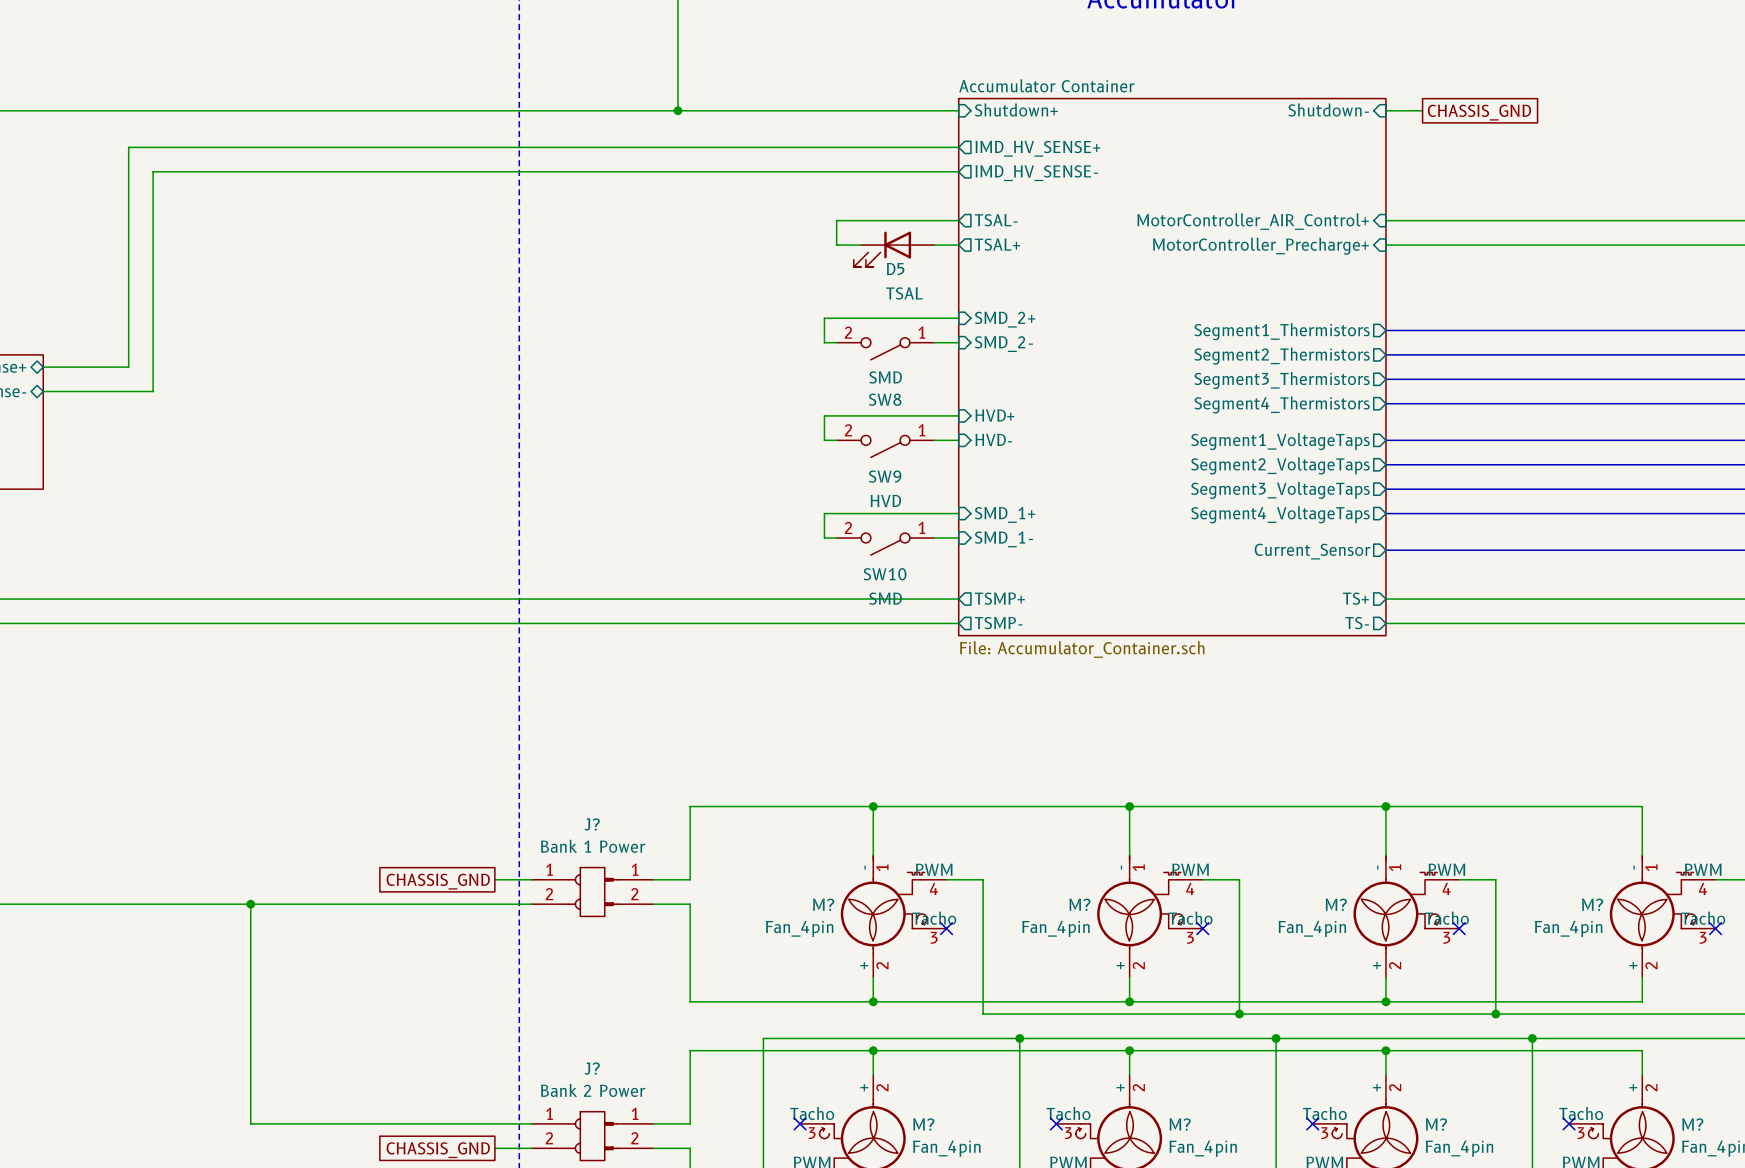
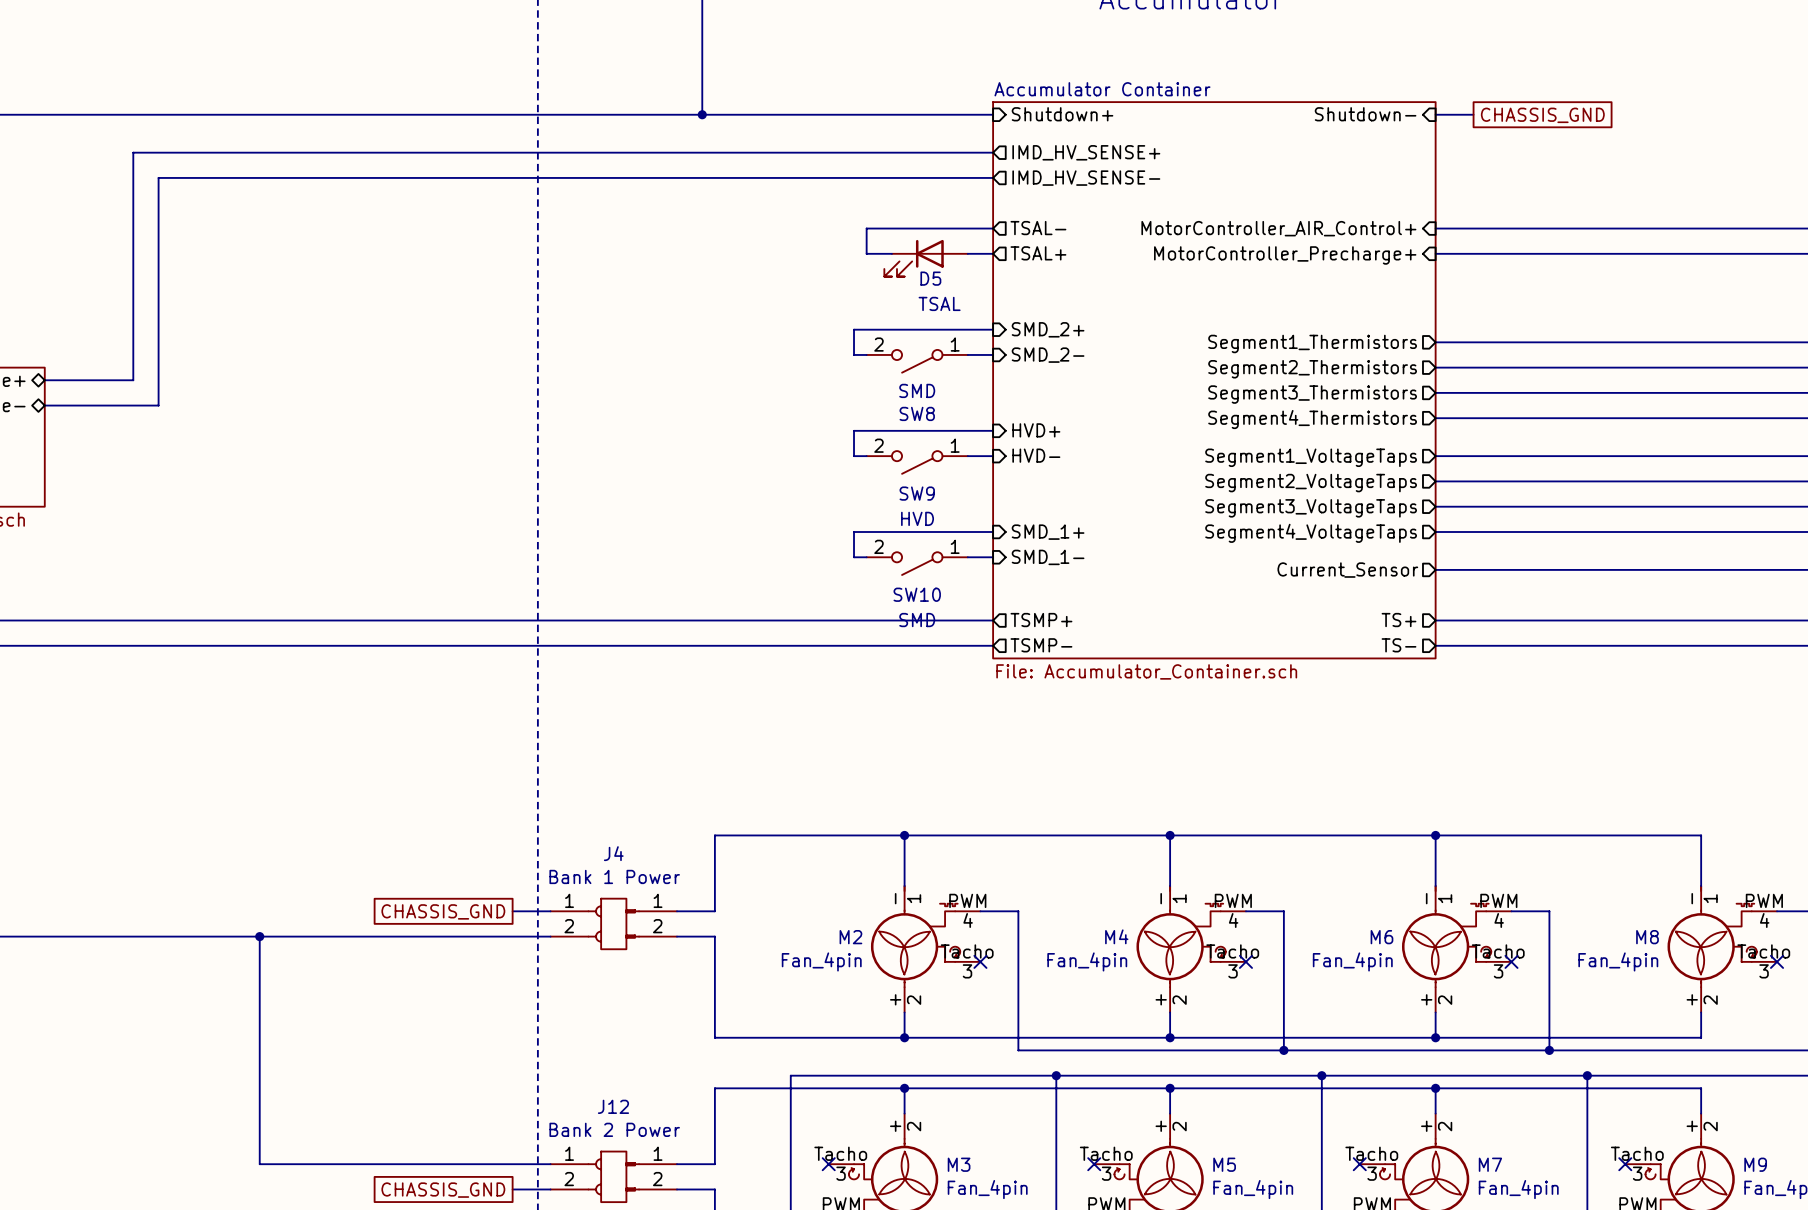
J? name: J? (592, 824) -> J4 (613, 853)
M? name: M? (823, 904) -> M2 (850, 937)
M? name: M? (1079, 904) -> M4 (1116, 936)
M? name: M? (1336, 904) -> M6 (1381, 937)
M? name: M? (1592, 904) -> M8 (1647, 937)
J? name: J? (592, 1068) -> J12 (613, 1106)
M? name: M? (923, 1124) -> M3 (959, 1164)
M? name: M? (1180, 1124) -> M5 (1224, 1164)
M? name: M? (1436, 1124) -> M7 (1490, 1164)
M? name: M? (1692, 1124) -> M9 (1755, 1164)

